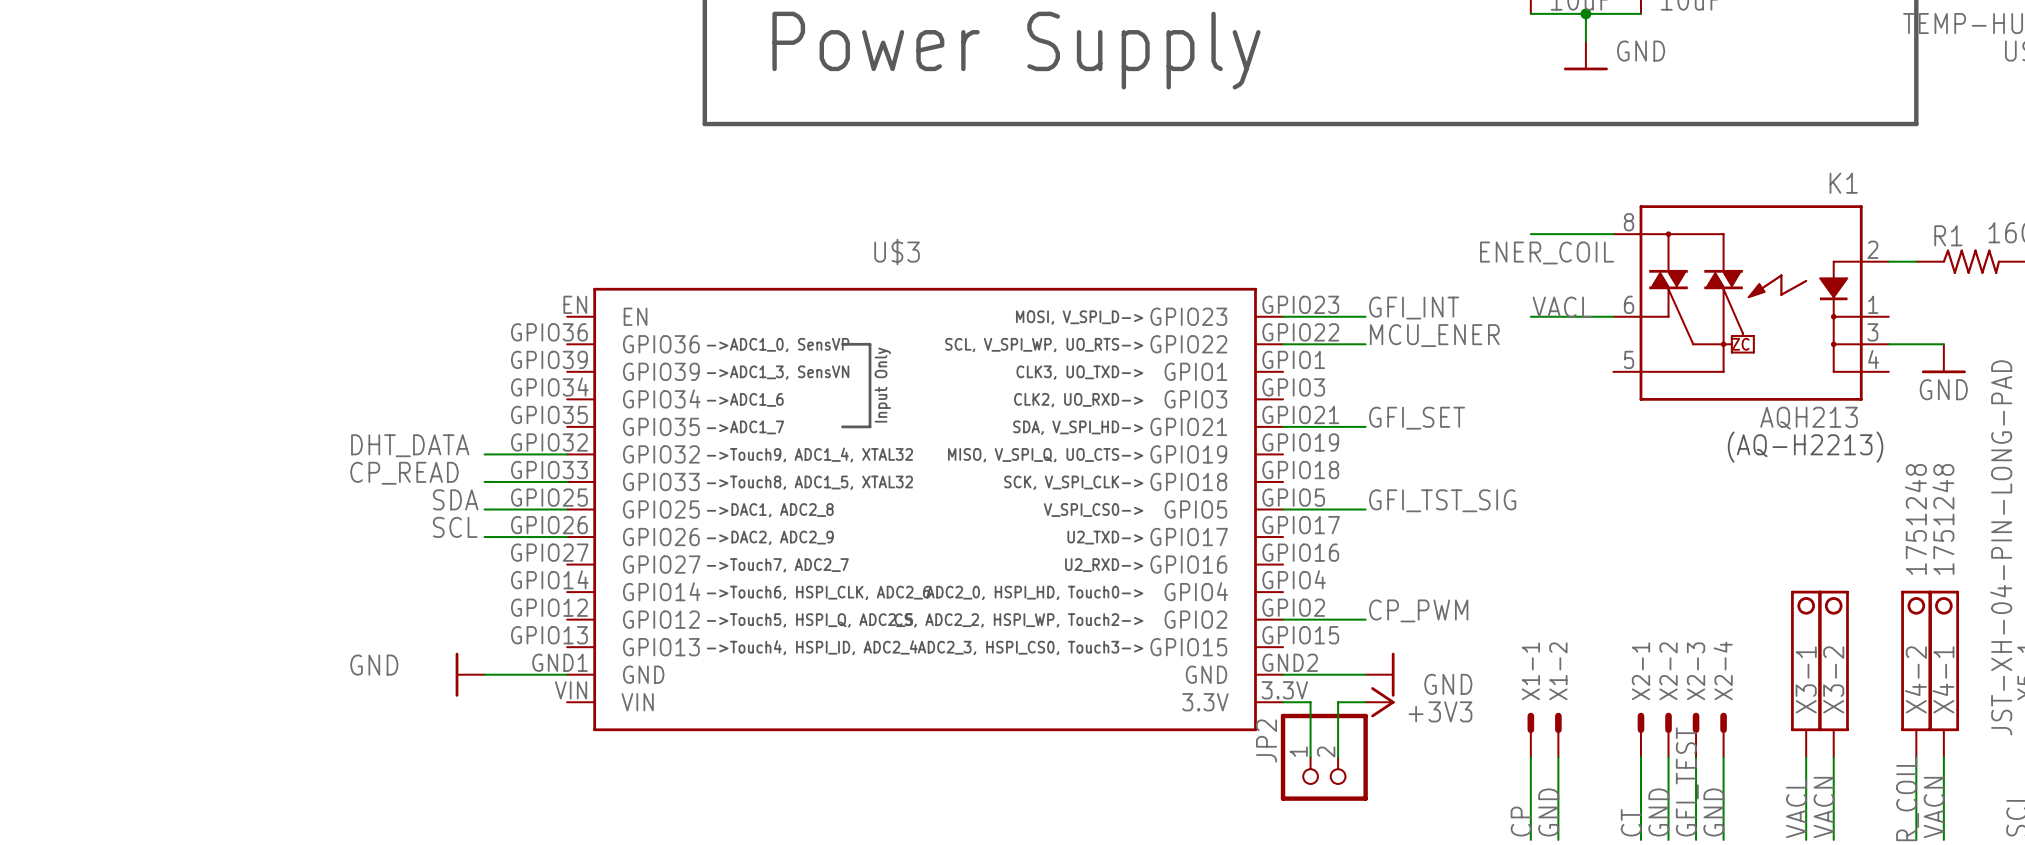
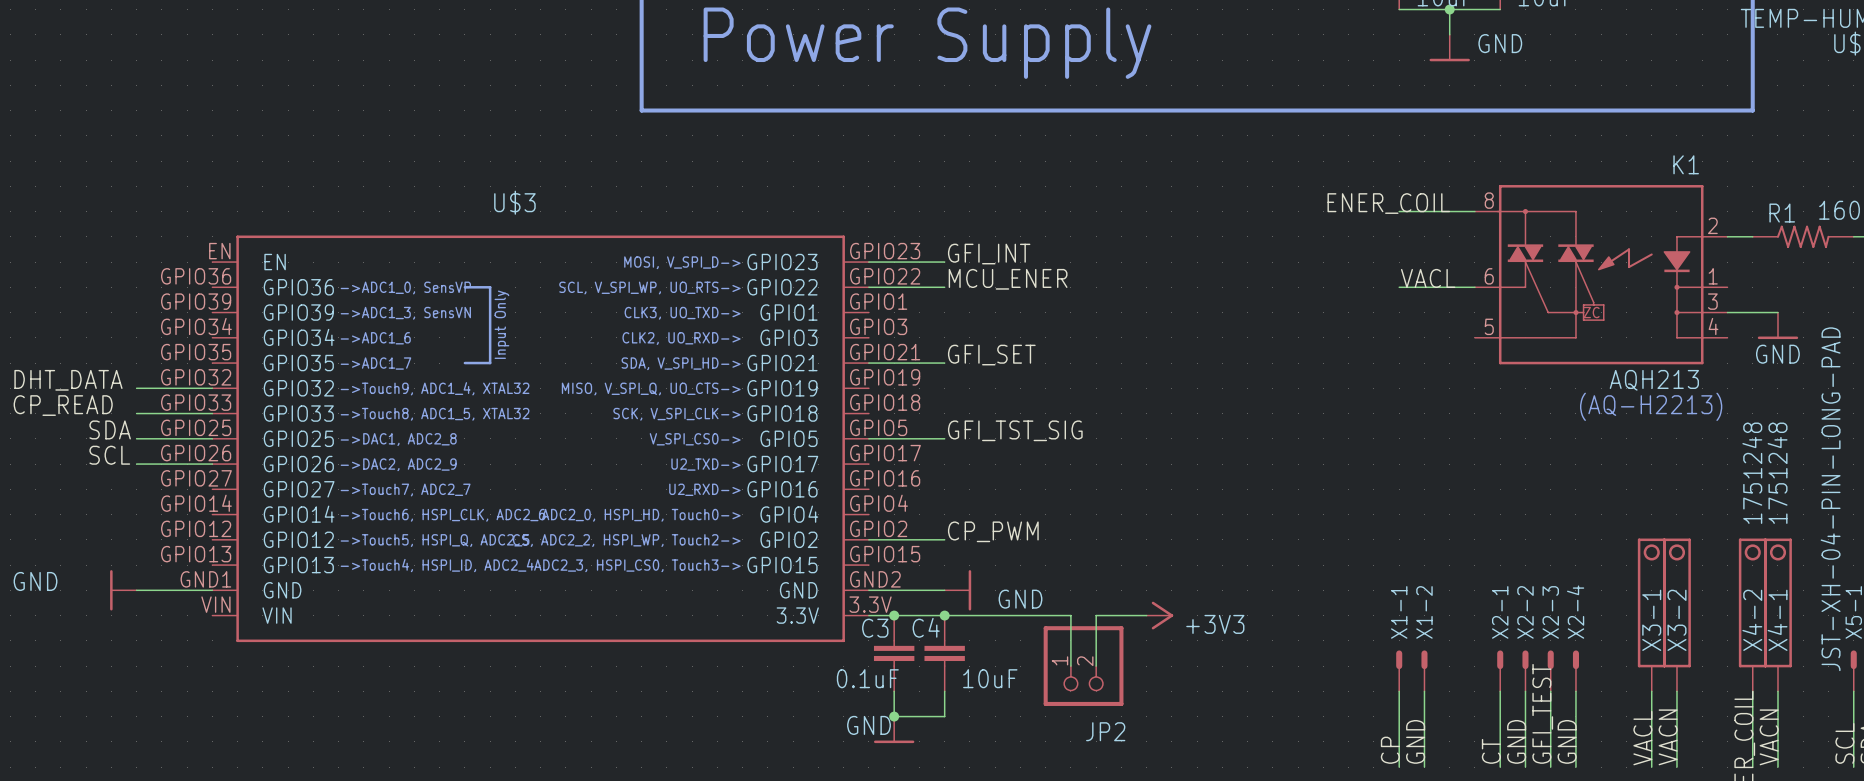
label position: ENER_COIL (1547, 252) -> ENER_COIL (1388, 203)
label: none -> GFI_INT (989, 254)
label: none -> MCU_ENER (1008, 279)
label: GFI_INT (1414, 308) -> none
wire: none -> (868, 287) (944, 287)
wire: (1283, 316) (1365, 316) -> none
label: MCU_ENER (1434, 335) -> none
wire: (1283, 344) (1365, 344) -> none
label: none -> GFI_SET (991, 355)
wire: none -> (868, 363) (944, 363)
label: none -> DHT_DATA (68, 380)
label: GFI_SET (1417, 418) -> none
wire: none -> (136, 388) (212, 388)
wire: (1283, 426) (1365, 426) -> none
label: none -> CP_READ (63, 405)
label: DHT_DATA (410, 445) -> none
wire: none -> (136, 413) (212, 413)
wire: (484, 454) (567, 454) -> none
label: none -> SDA (110, 429)
label: CP_READ (404, 473) -> none
label: none -> GFI_TST_SIG (1015, 430)
wire: none -> (136, 438) (212, 438)
wire: (484, 481) (567, 481) -> none
wire: none -> (868, 438) (944, 438)
label: none -> SCL (109, 455)
label: SDA (455, 499) -> none
label: GFI_TST_SIG (1442, 500) -> none
wire: none -> (136, 464) (212, 464)
wire: (484, 509) (567, 509) -> none
U$3 position: (925, 509) -> (540, 438)
wire: (1283, 509) (1365, 509) -> none
label: SCL (455, 527) -> none
wire: (484, 537) (567, 537) -> none
label: none -> CP_PWM (993, 531)
wire: none -> (868, 539) (944, 539)
label: CP_PWM (1418, 610) -> none
wire: (1283, 619) (1365, 619) -> none
power symbol: none -> GND (123, 590)
wire: none -> (136, 590) (212, 590)
wire: none -> (868, 590) (944, 590)
power symbol: none -> GND (957, 590)
power symbol: GND (470, 674) -> none
wire: (484, 674) (567, 674) -> none
wire: none -> (868, 615) (1070, 615) (1070, 666)
junction: none -> (894, 615)
junction: none -> (944, 615)
wire: none -> (1146, 615) (1096, 615) (1096, 666)
wire: (1283, 674) (1365, 674) -> none
power symbol: GND (1380, 674) -> none
wire: (1283, 702) (1310, 702) (1310, 757) -> none
wire: (1365, 702) (1338, 702) (1338, 757) -> none
power symbol position: +3V3 (1380, 702) -> +3V3 (1159, 615)
C3: none -> 0.1uF (894, 653)
C4: none -> 10uF (944, 653)
JP2 name rotation: 0° (1266, 740) -> 90° clockwise (1105, 731)
JP2 name position: JP2 (1266, 740) -> JP2 (1105, 731)
wire: none -> (894, 691) (894, 716) (944, 716) (944, 691)
JP2 position: (1324, 757) -> (1083, 666)
junction: none -> (894, 716)
power symbol: none -> GND (894, 729)

